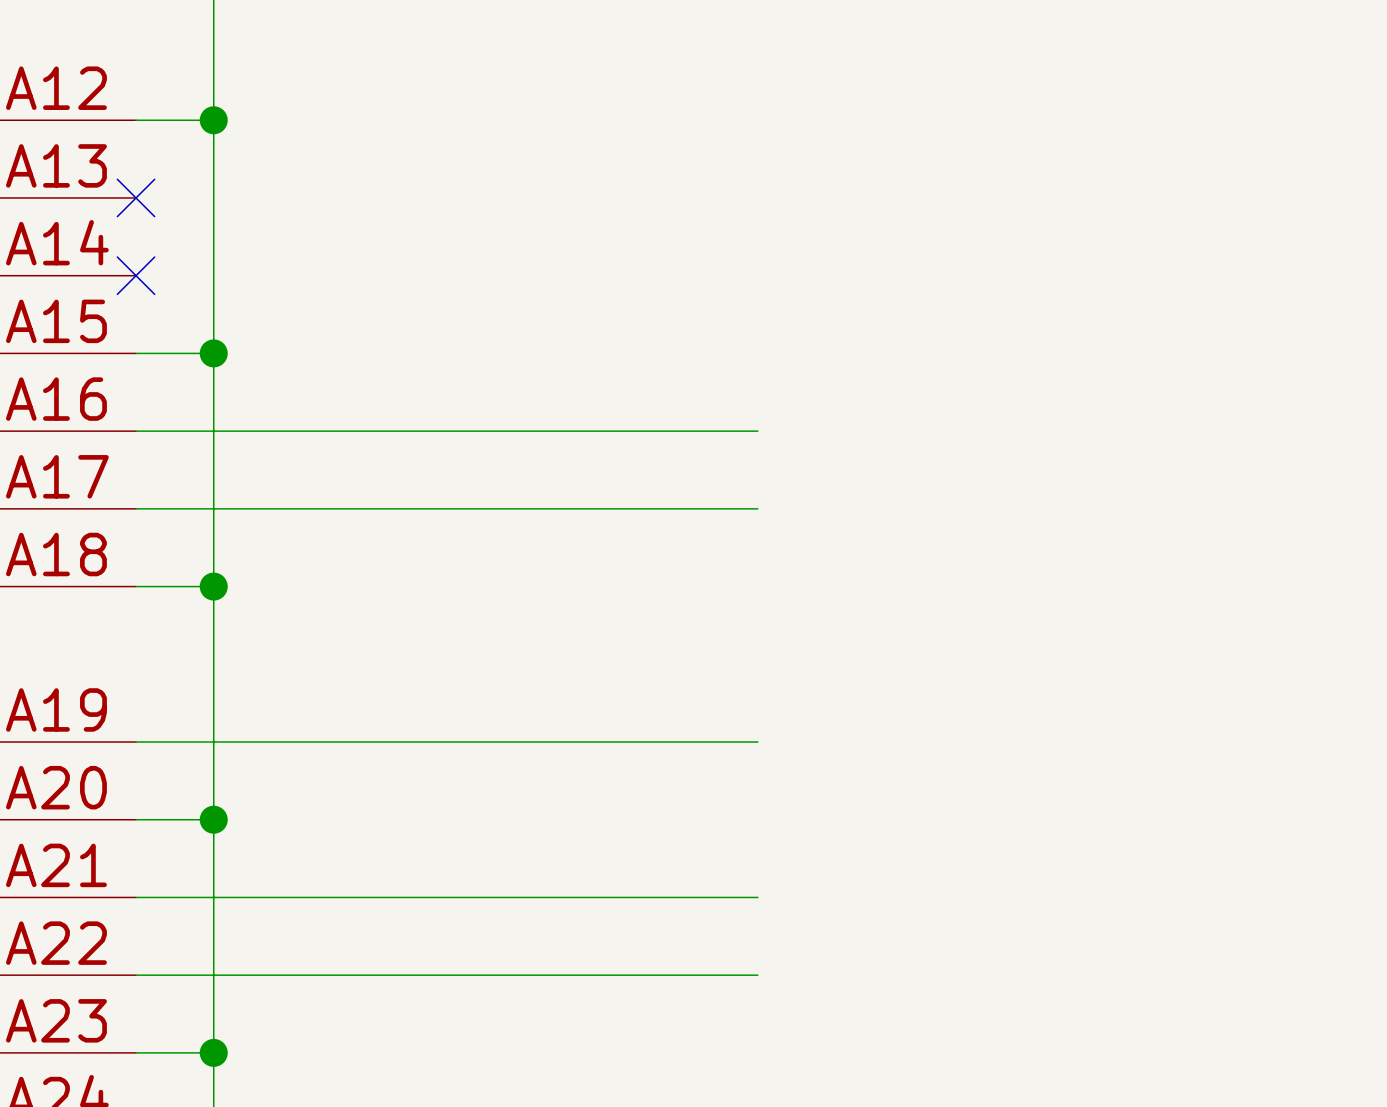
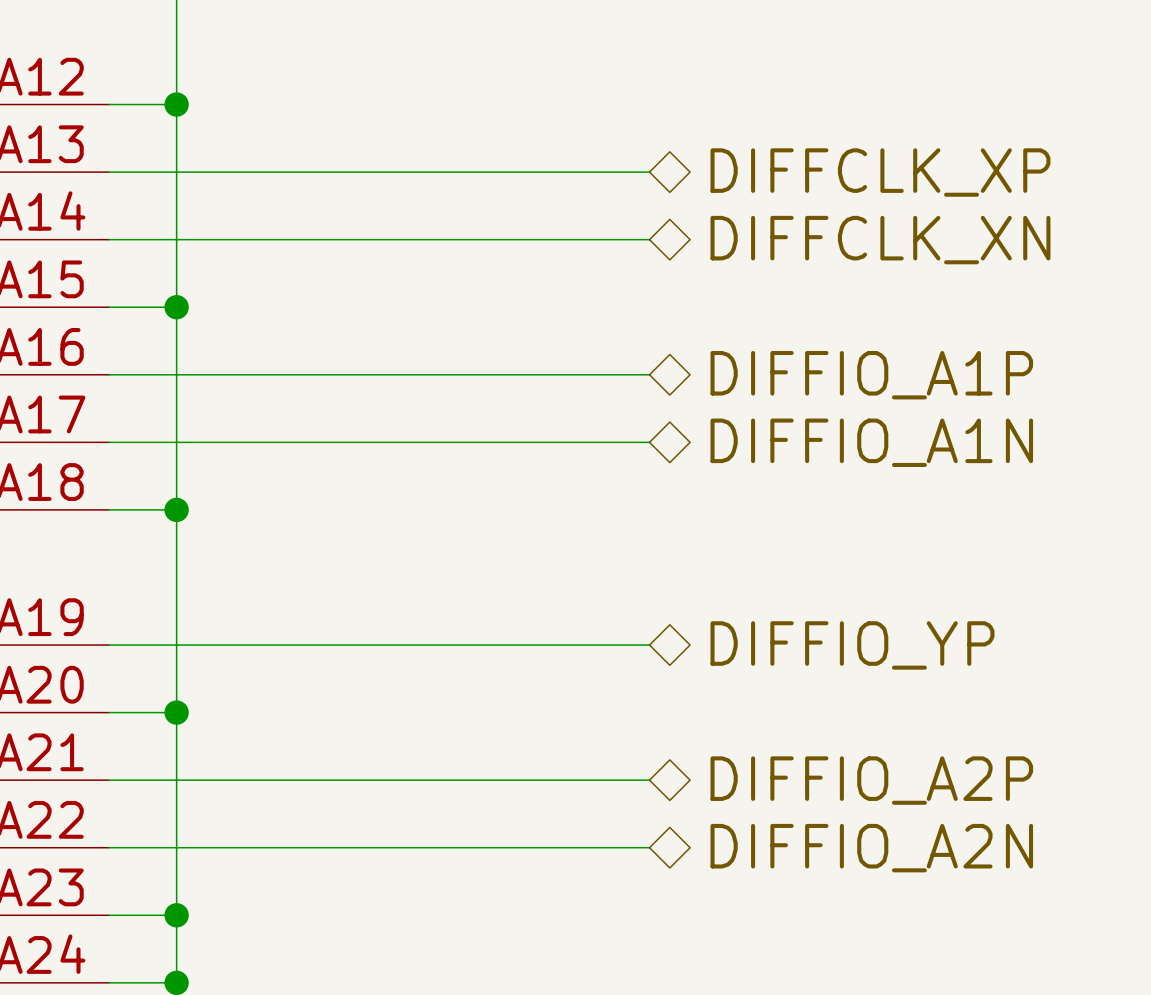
wire: none -> (109, 172) (649, 172)
no-connect mark: (136, 197) -> none
hierarchical label: none -> DIFFCLK_XP (880, 172)
wire: none -> (109, 239) (649, 239)
no-connect mark: (136, 275) -> none
hierarchical label: none -> DIFFCLK_XN (880, 240)
hierarchical label: none -> DIFFIO_A1P (871, 375)
hierarchical label: none -> DIFFIO_A1N (871, 442)
hierarchical label: none -> DIFFIO_YP (852, 645)
hierarchical label: none -> DIFFIO_A2P (871, 780)
hierarchical label: none -> DIFFIO_A2N (871, 848)

